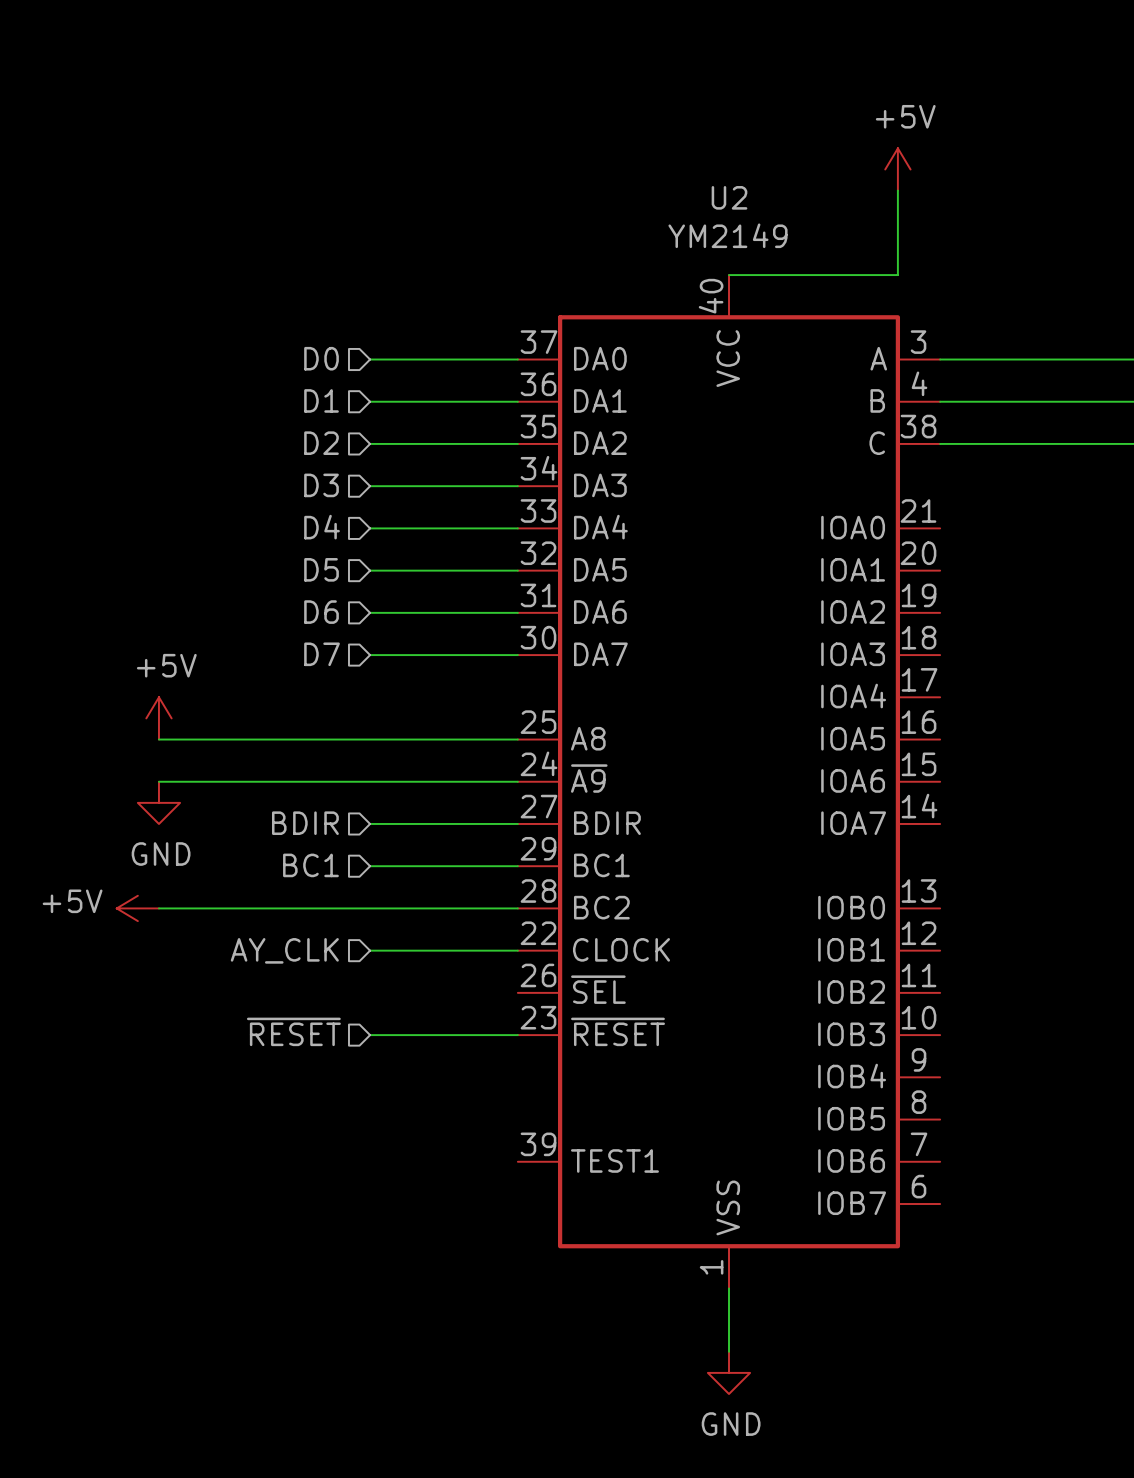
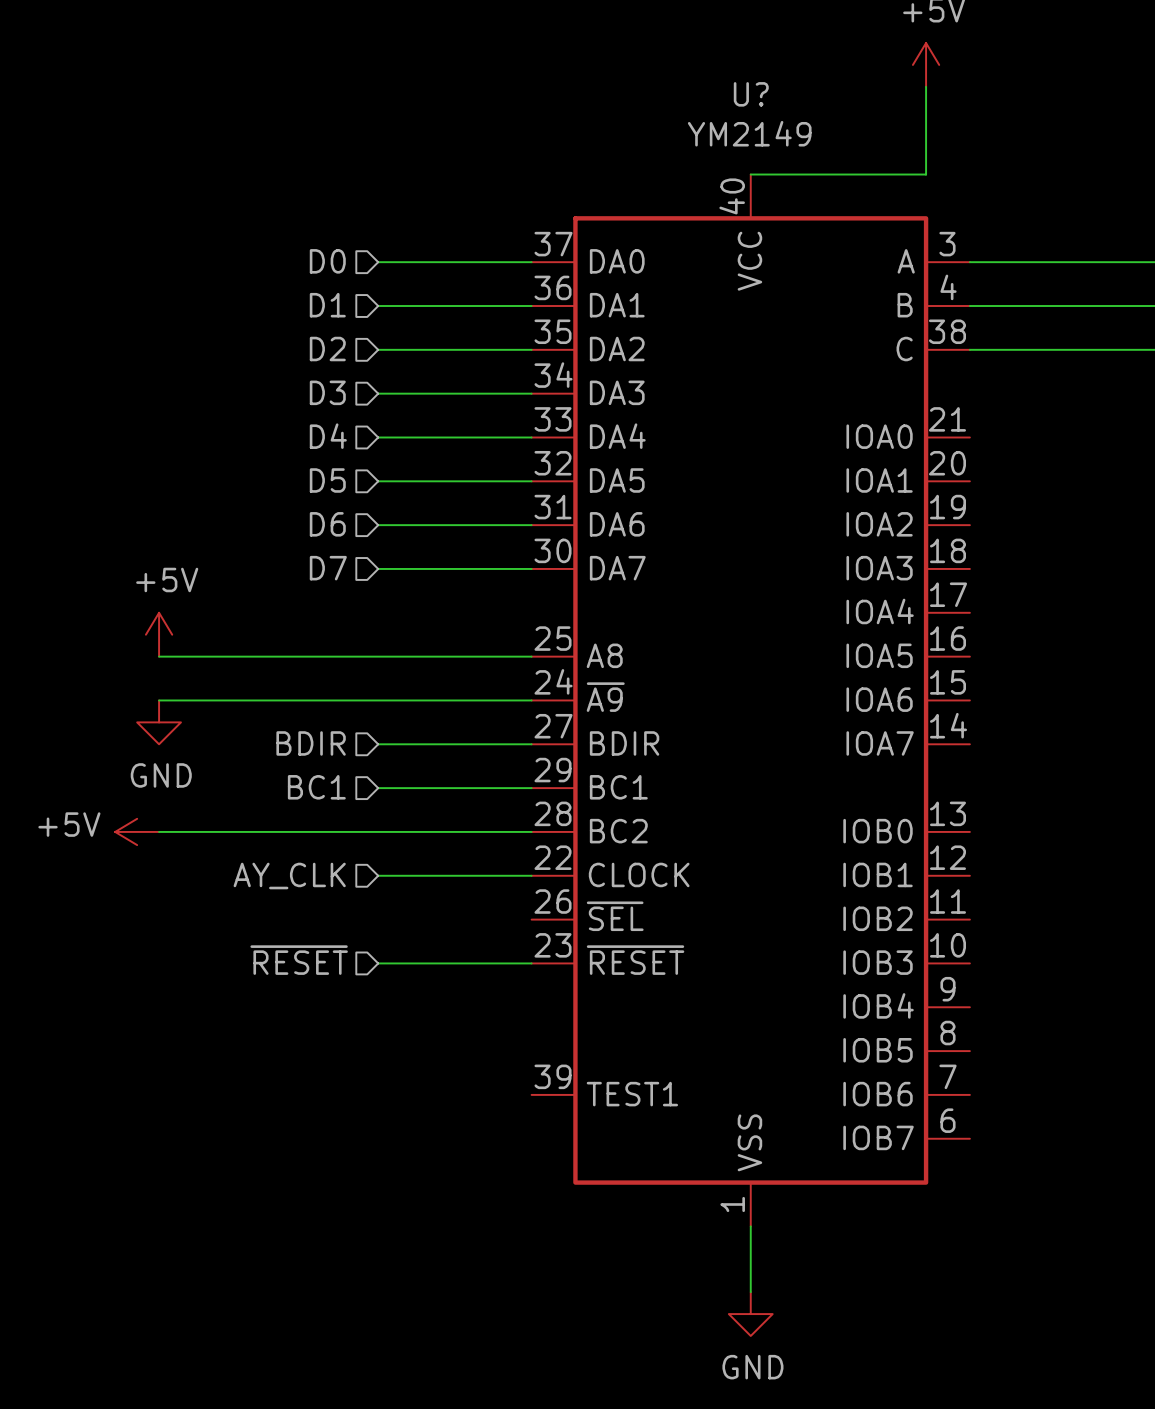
U2 name: U2 (729, 197) -> U? (751, 94)

